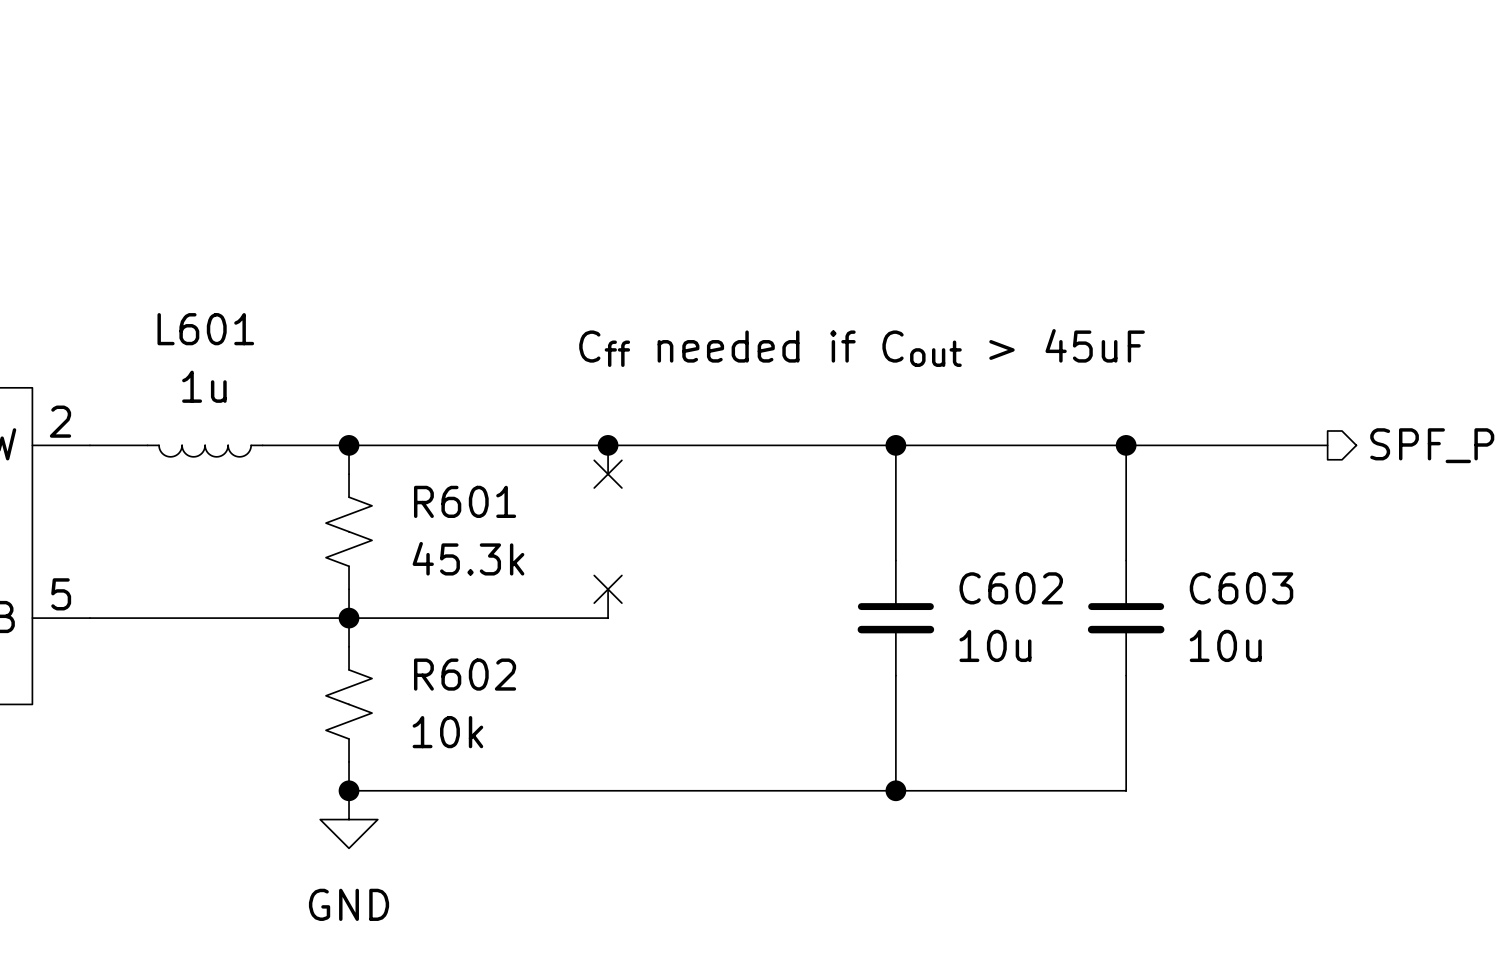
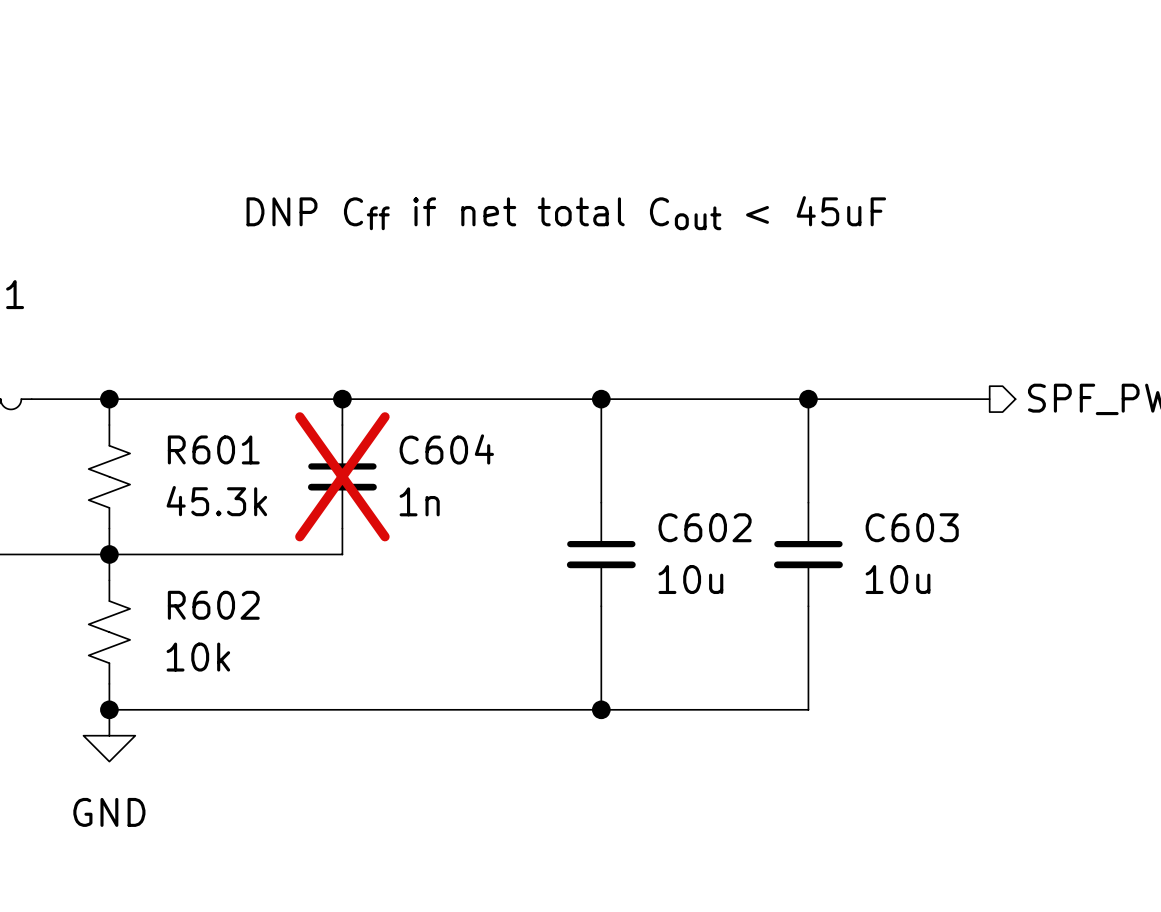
text: none -> DNP Cff if net total Cout < 45uF (566, 213)
text: Cff needed if Cout > 45uF (862, 348) -> none
no-connect mark: (608, 474) -> none
C604: none -> 1n (342, 476)
no-connect mark: (608, 589) -> none

